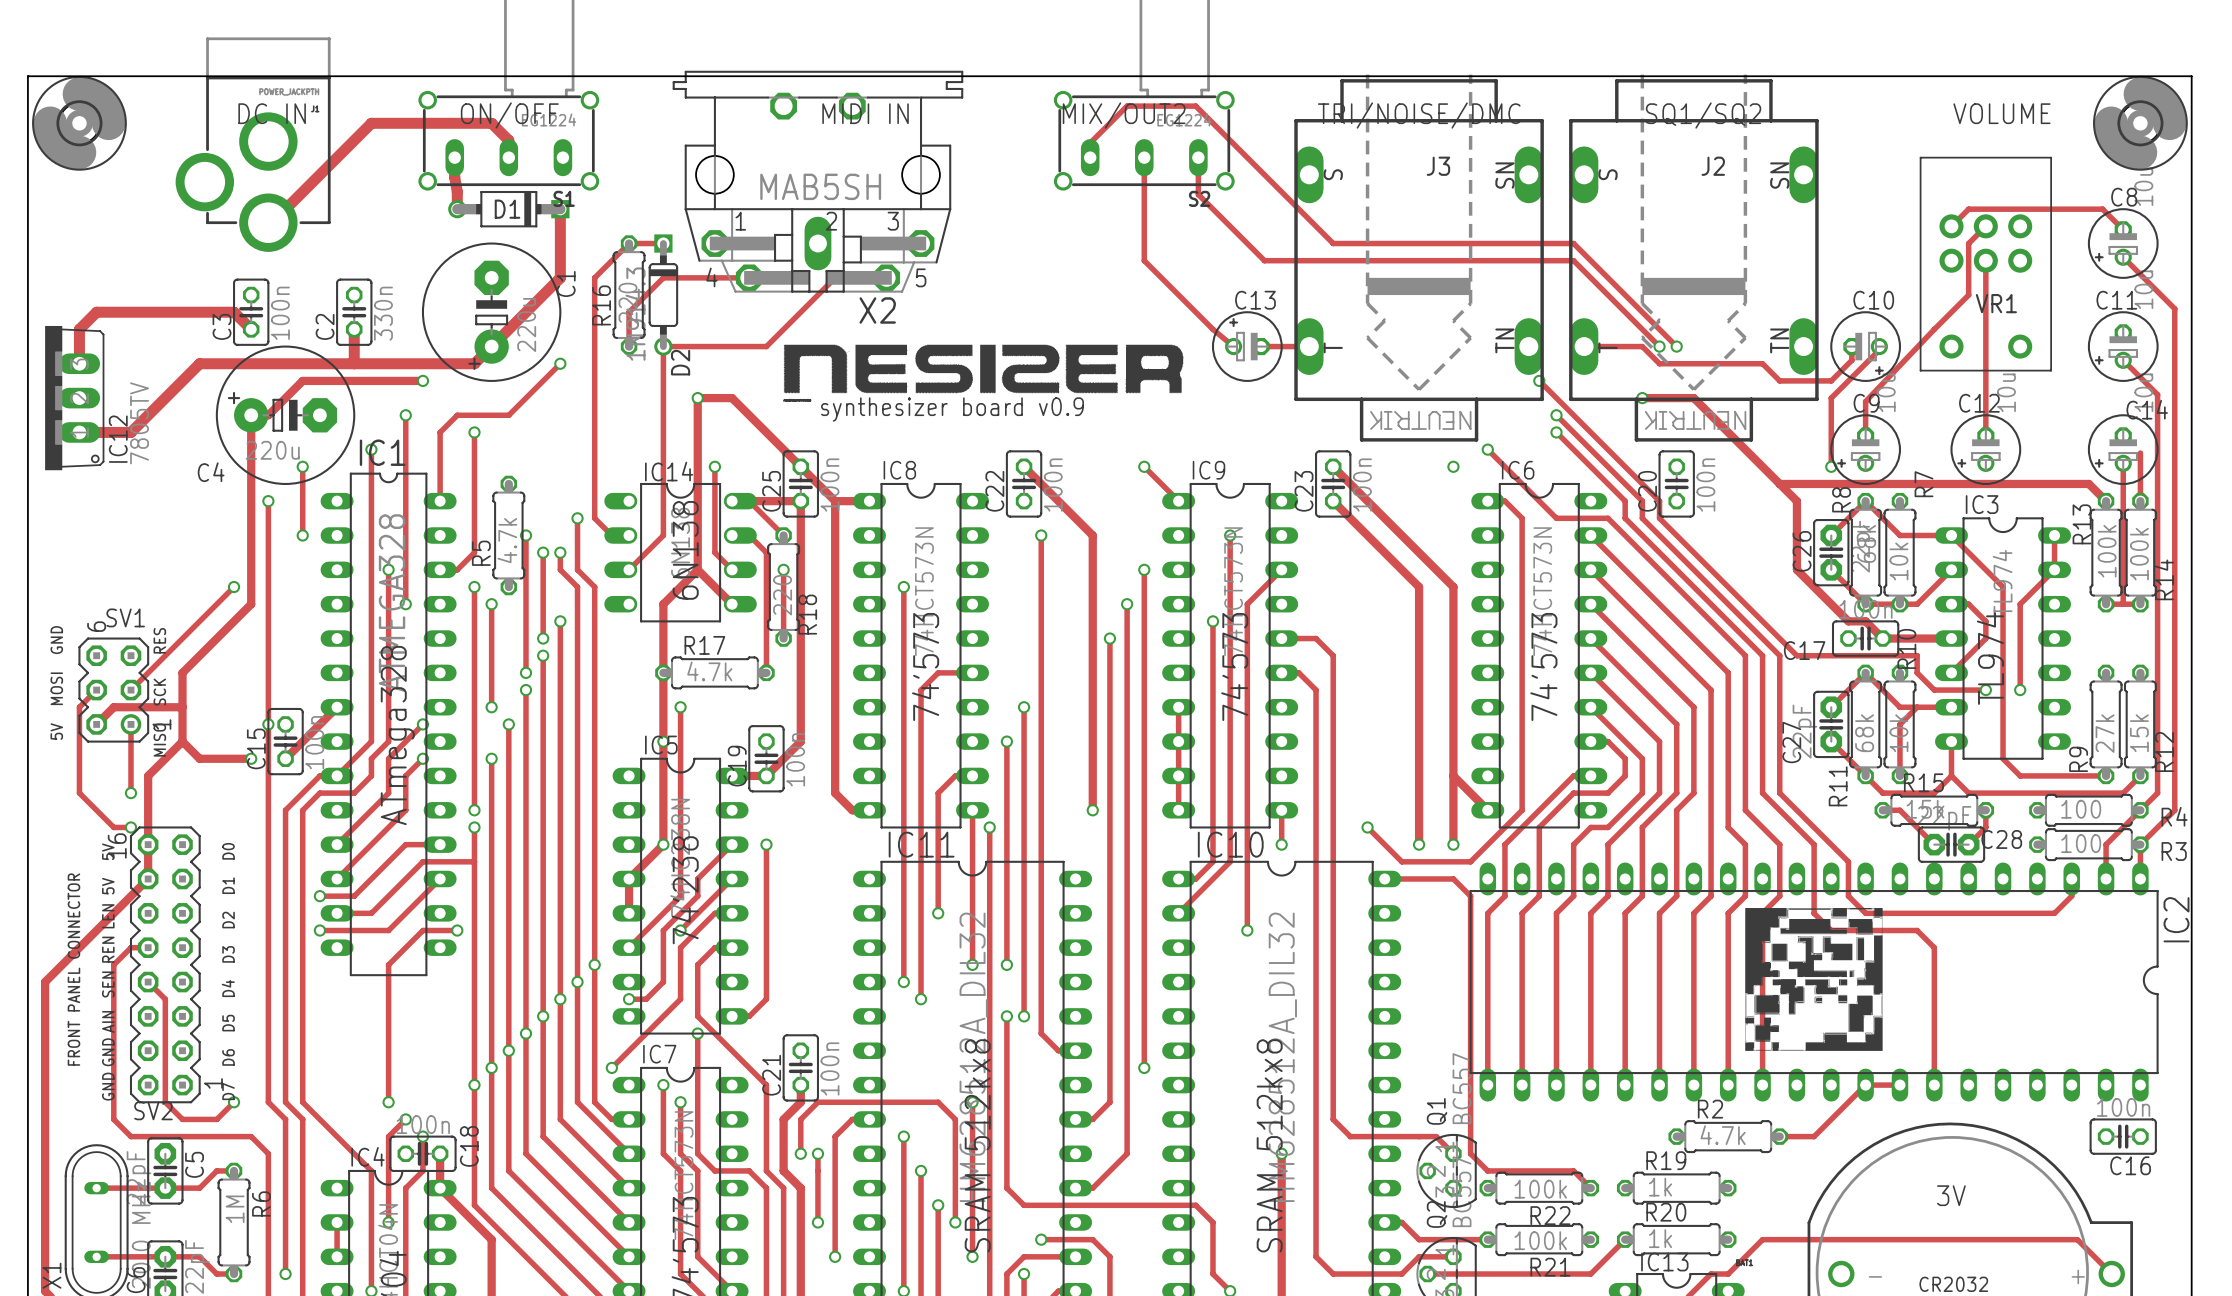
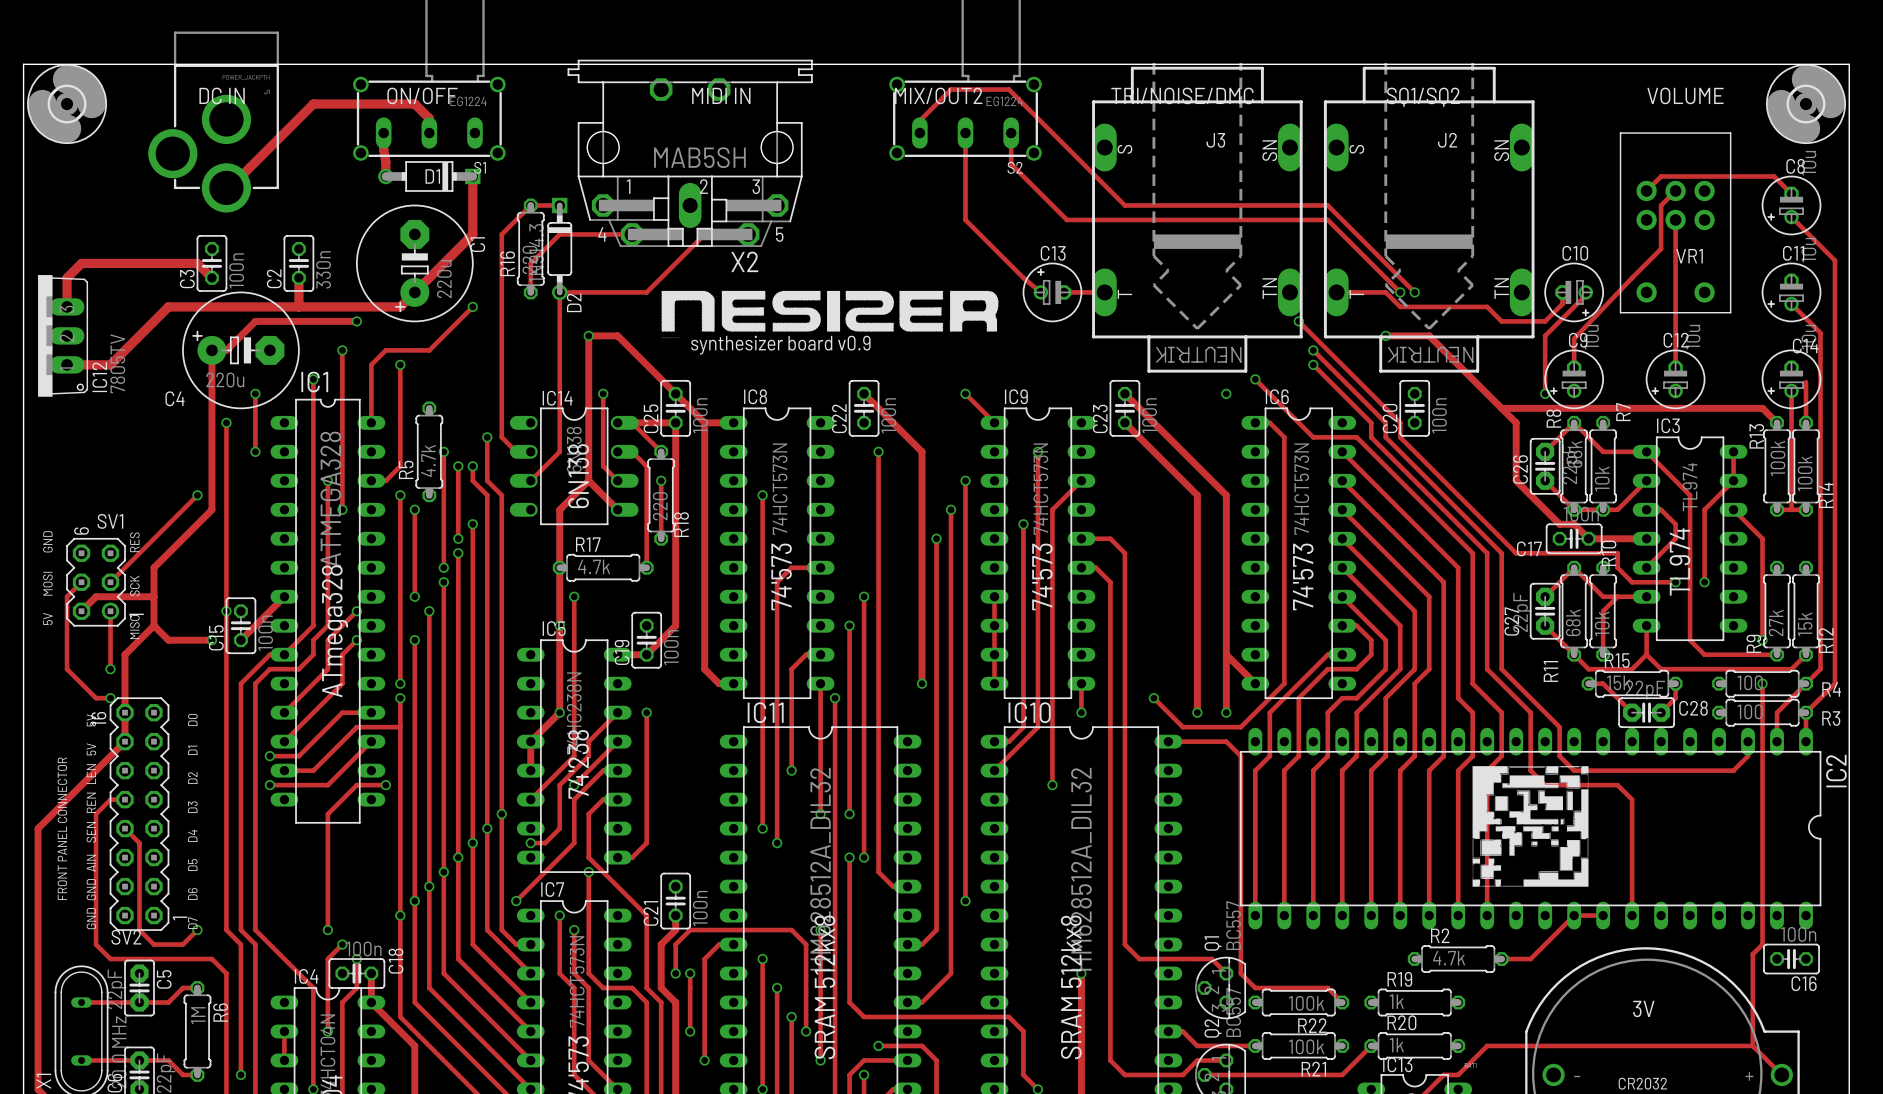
track: none -> (1733, 509) (1762, 538) (1762, 640)
via: none -> (1762, 640)
track: none -> (1762, 683) (1762, 944) (1752, 954) (1752, 1045)
via: none -> (1762, 683)

